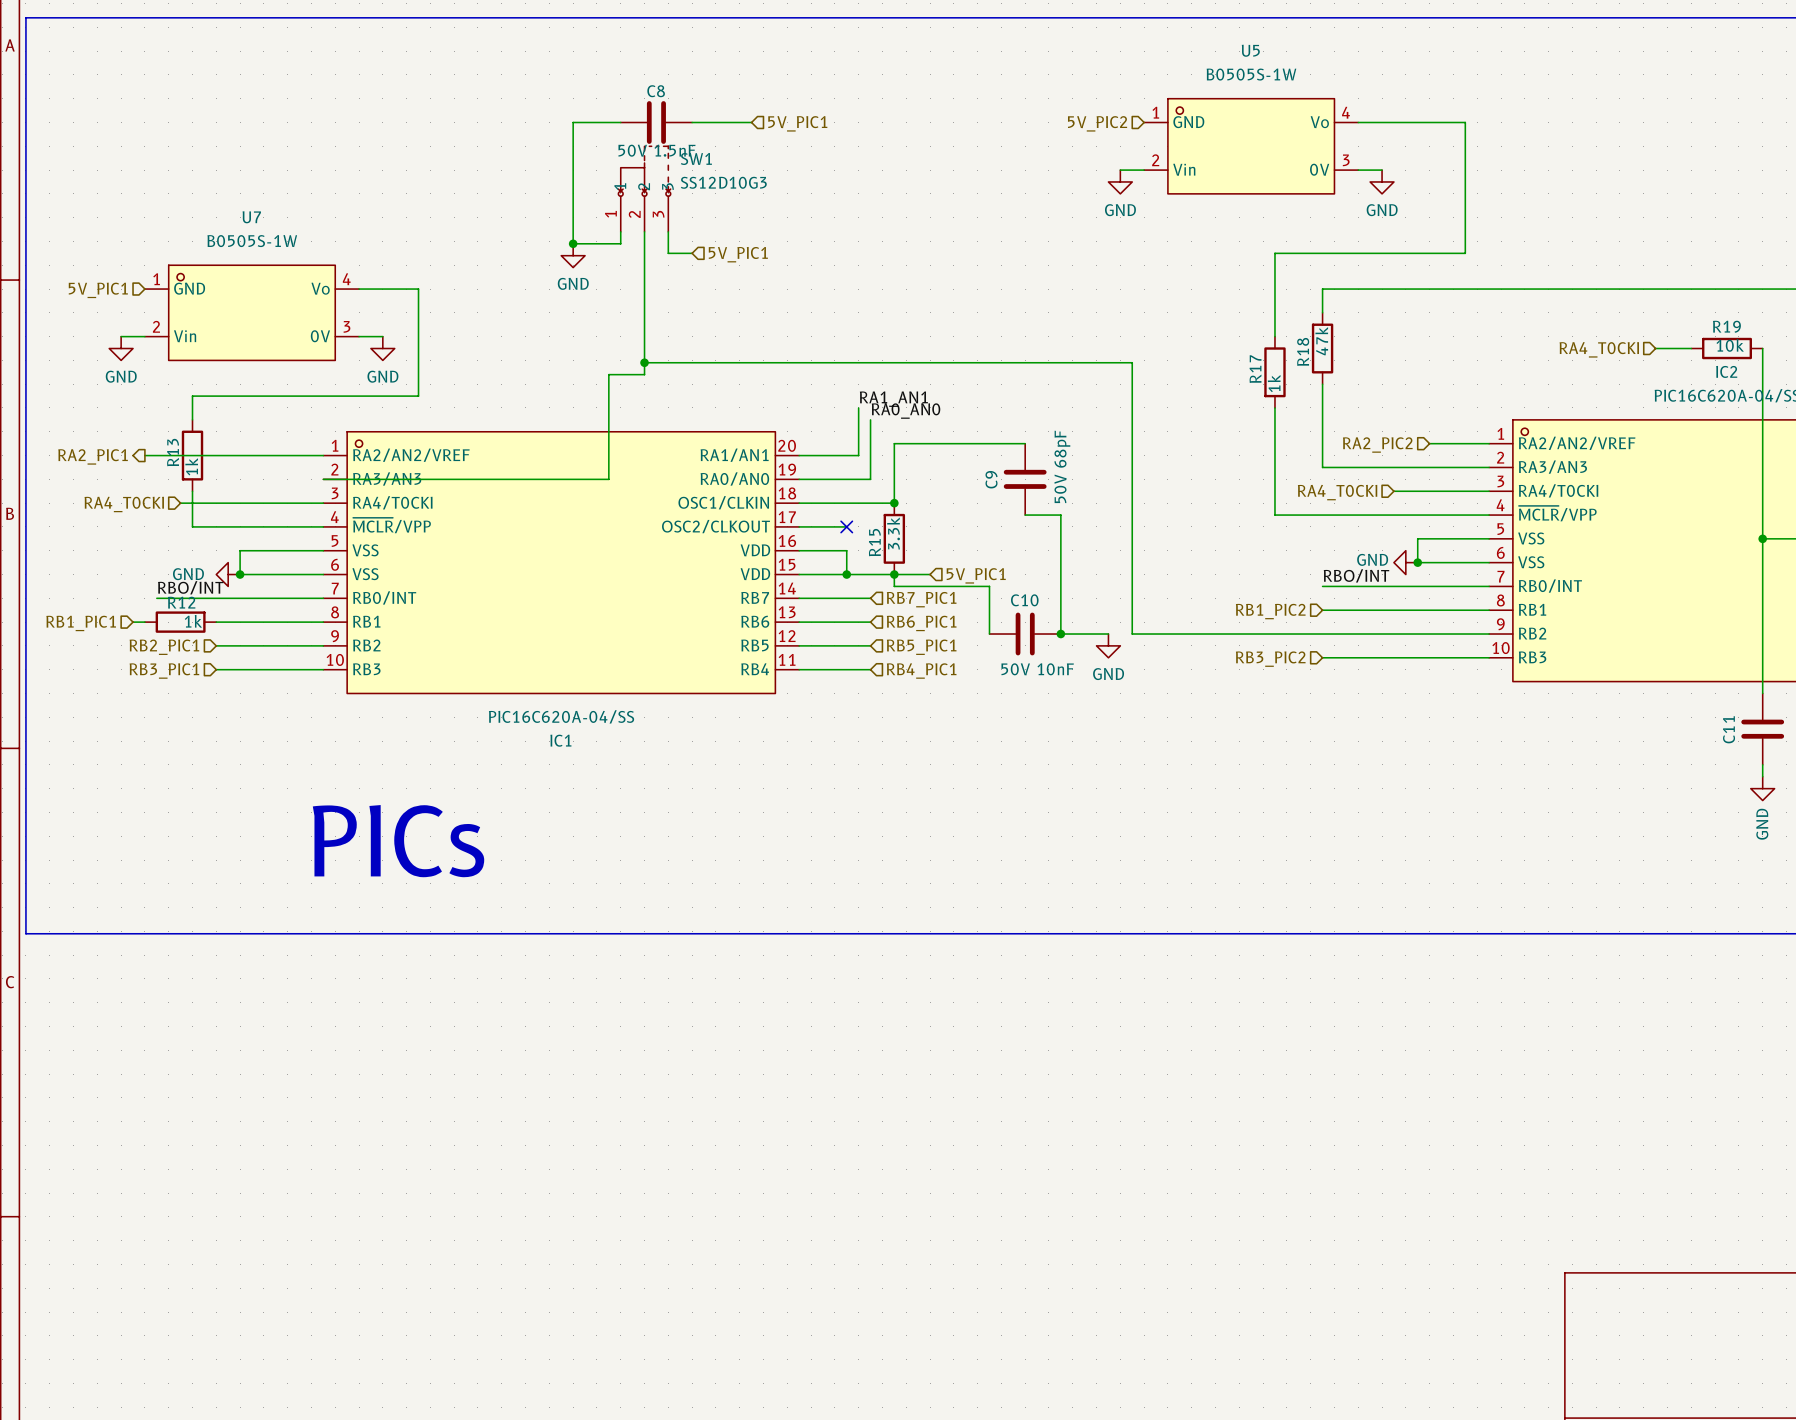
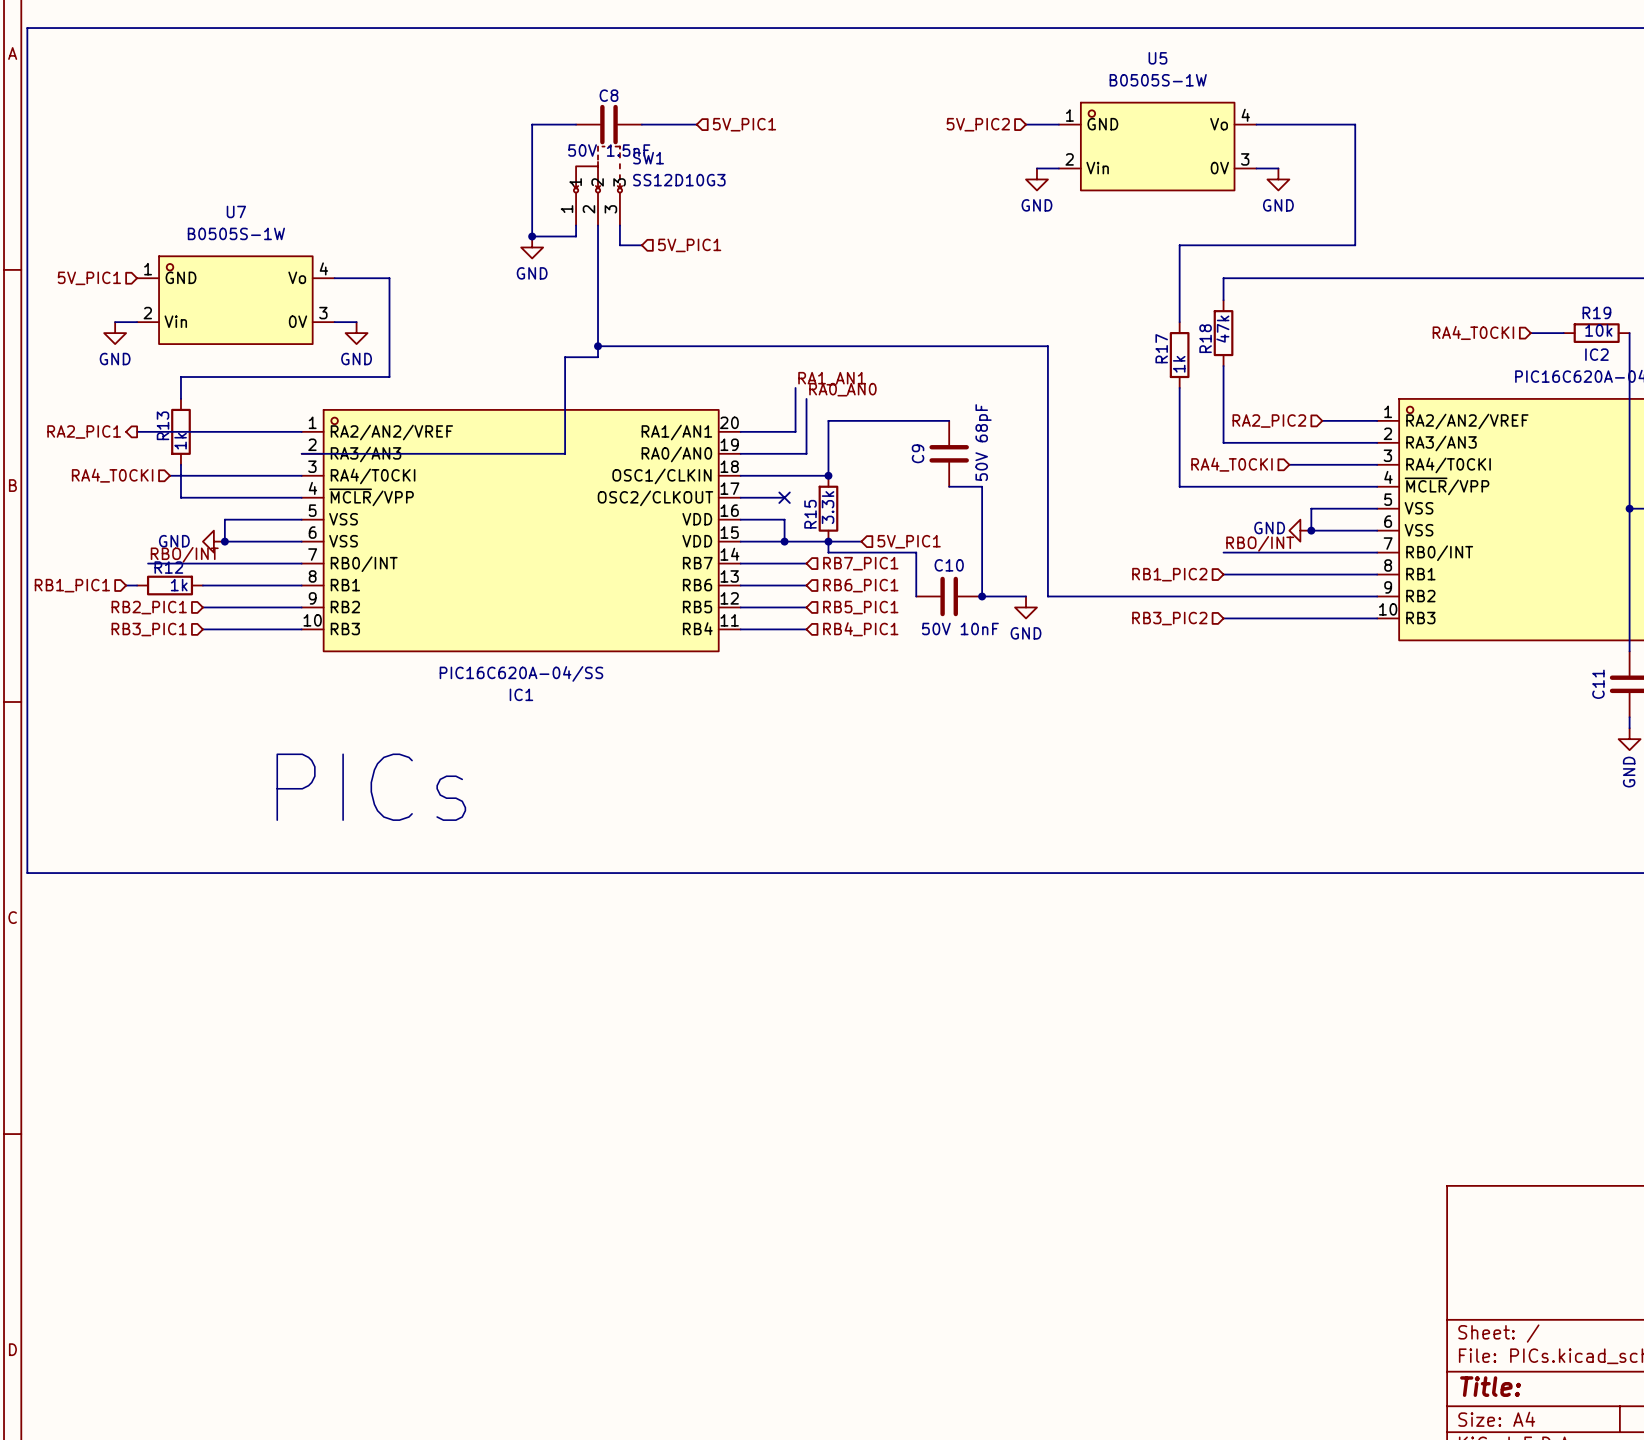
wire: none -> (1026, 124) (1058, 124)
hierarchical label position: 5V_PIC2 (1097, 123) -> 5V_PIC2 (978, 124)

